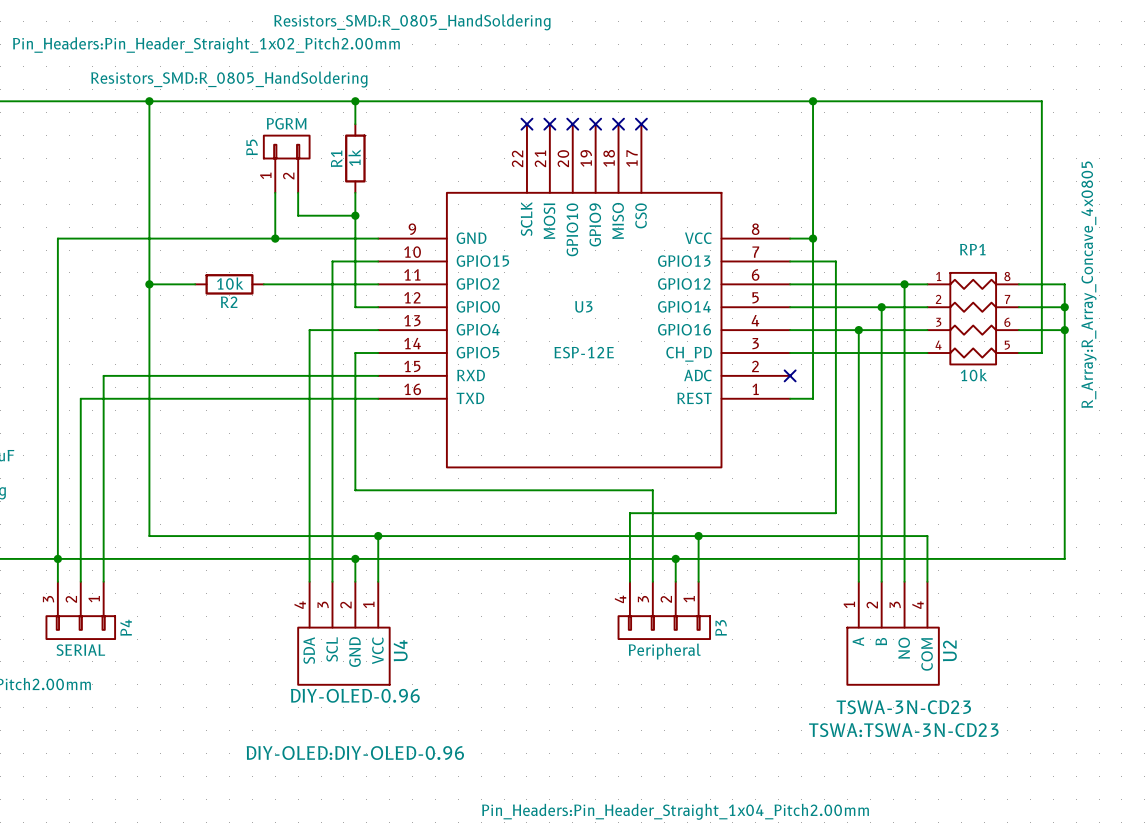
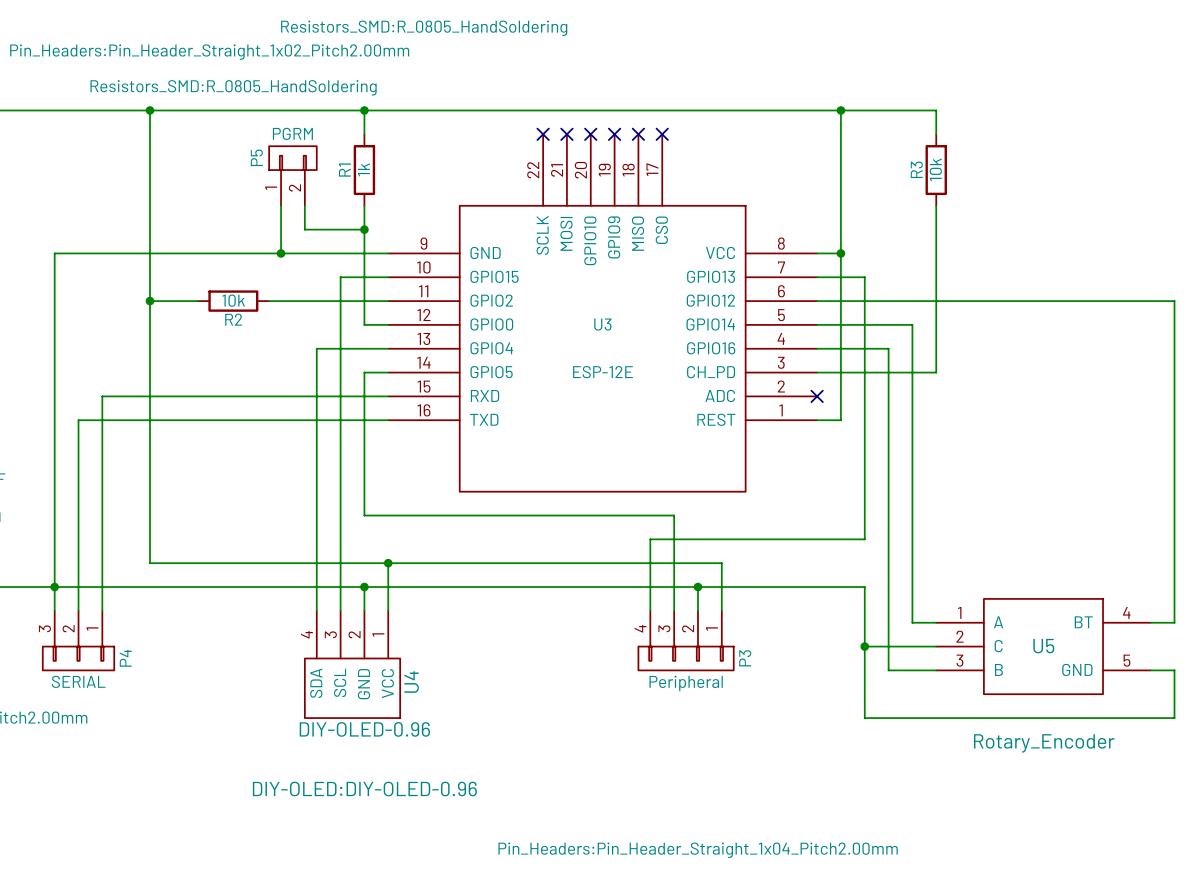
wire: (904, 101) (1041, 101) (1041, 353) (1018, 353) -> (936, 110) (936, 134)
R3: none -> 10k (936, 170)
wire: none -> (936, 205) (936, 301)
junction: (904, 284) -> none
wire: (1064, 284) (1064, 558) (835, 558) -> (1103, 301) (1174, 301) (1174, 622) (1150, 622)
wire: (881, 307) (927, 307) -> none
junction: (881, 307) -> none
wire: (1018, 307) (1064, 307) -> none
junction: (1064, 307) -> none
RP1: 10k (973, 318) -> none
wire: (858, 330) (927, 330) -> none
junction: (858, 330) -> none
wire: (1018, 330) (1064, 330) -> none
junction: (1064, 330) -> none
wire: (927, 353) (904, 353) (904, 581) -> none
wire: (698, 536) (927, 536) (927, 581) -> none
junction: (698, 536) -> none
wire: none -> (864, 587) (864, 718) (1174, 718) (1174, 670) (1150, 670)
wire: none -> (888, 610) (888, 670) (936, 670)
wire: none -> (912, 610) (912, 622) (936, 622)
wire: none -> (864, 646) (936, 646)
junction: none -> (864, 646)
U5: none -> Rotary_Encoder (1043, 646)
U2: TSWA-3N-CD23 (893, 633) -> none

